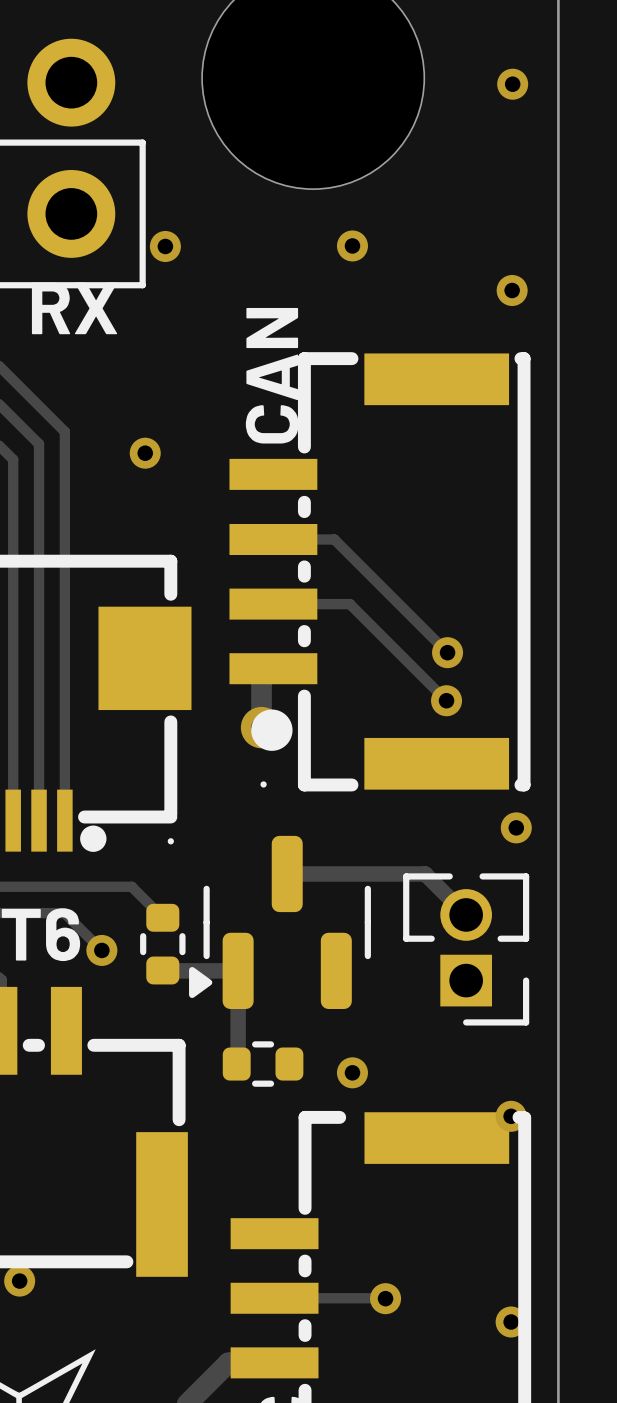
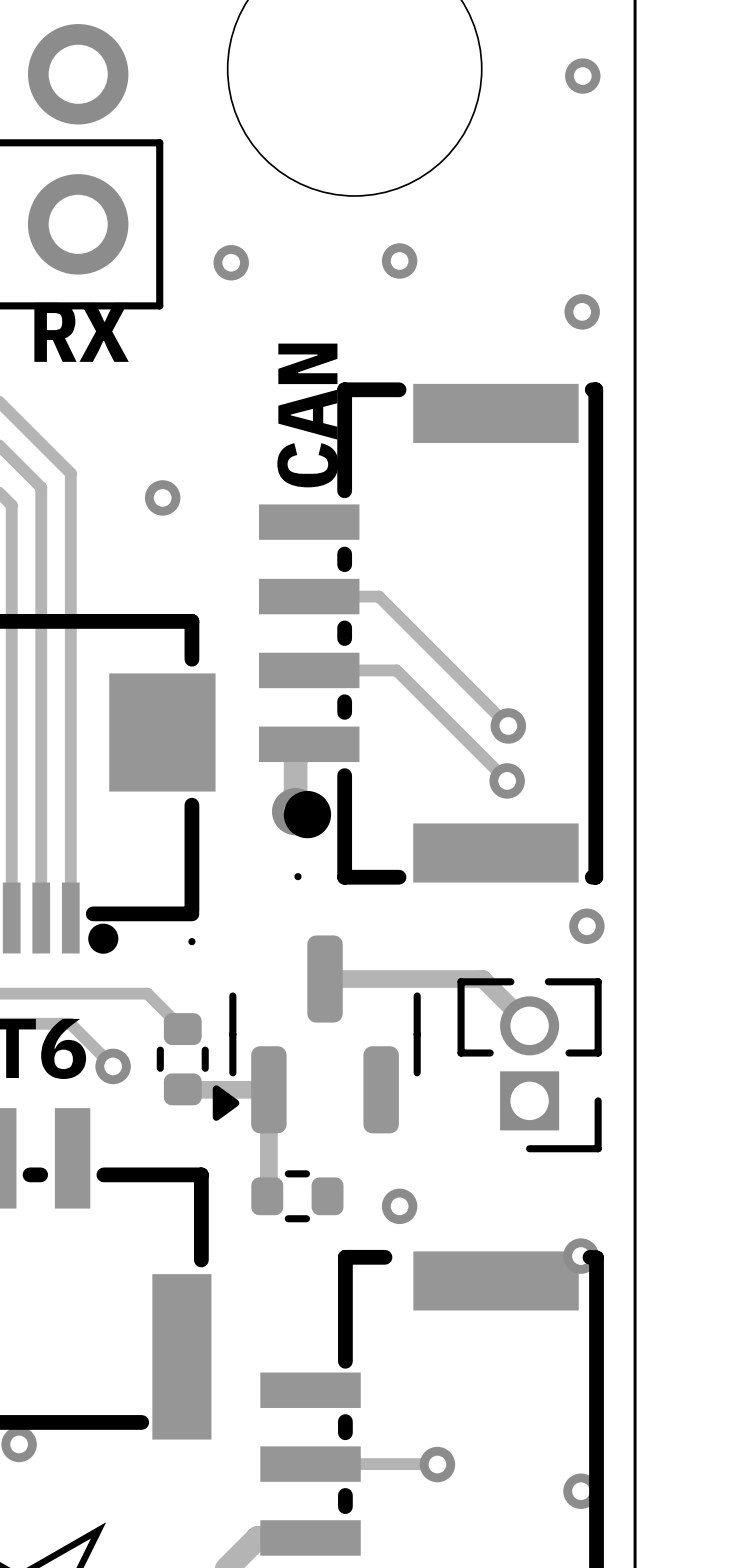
via position: (165, 246) -> (231, 262)

